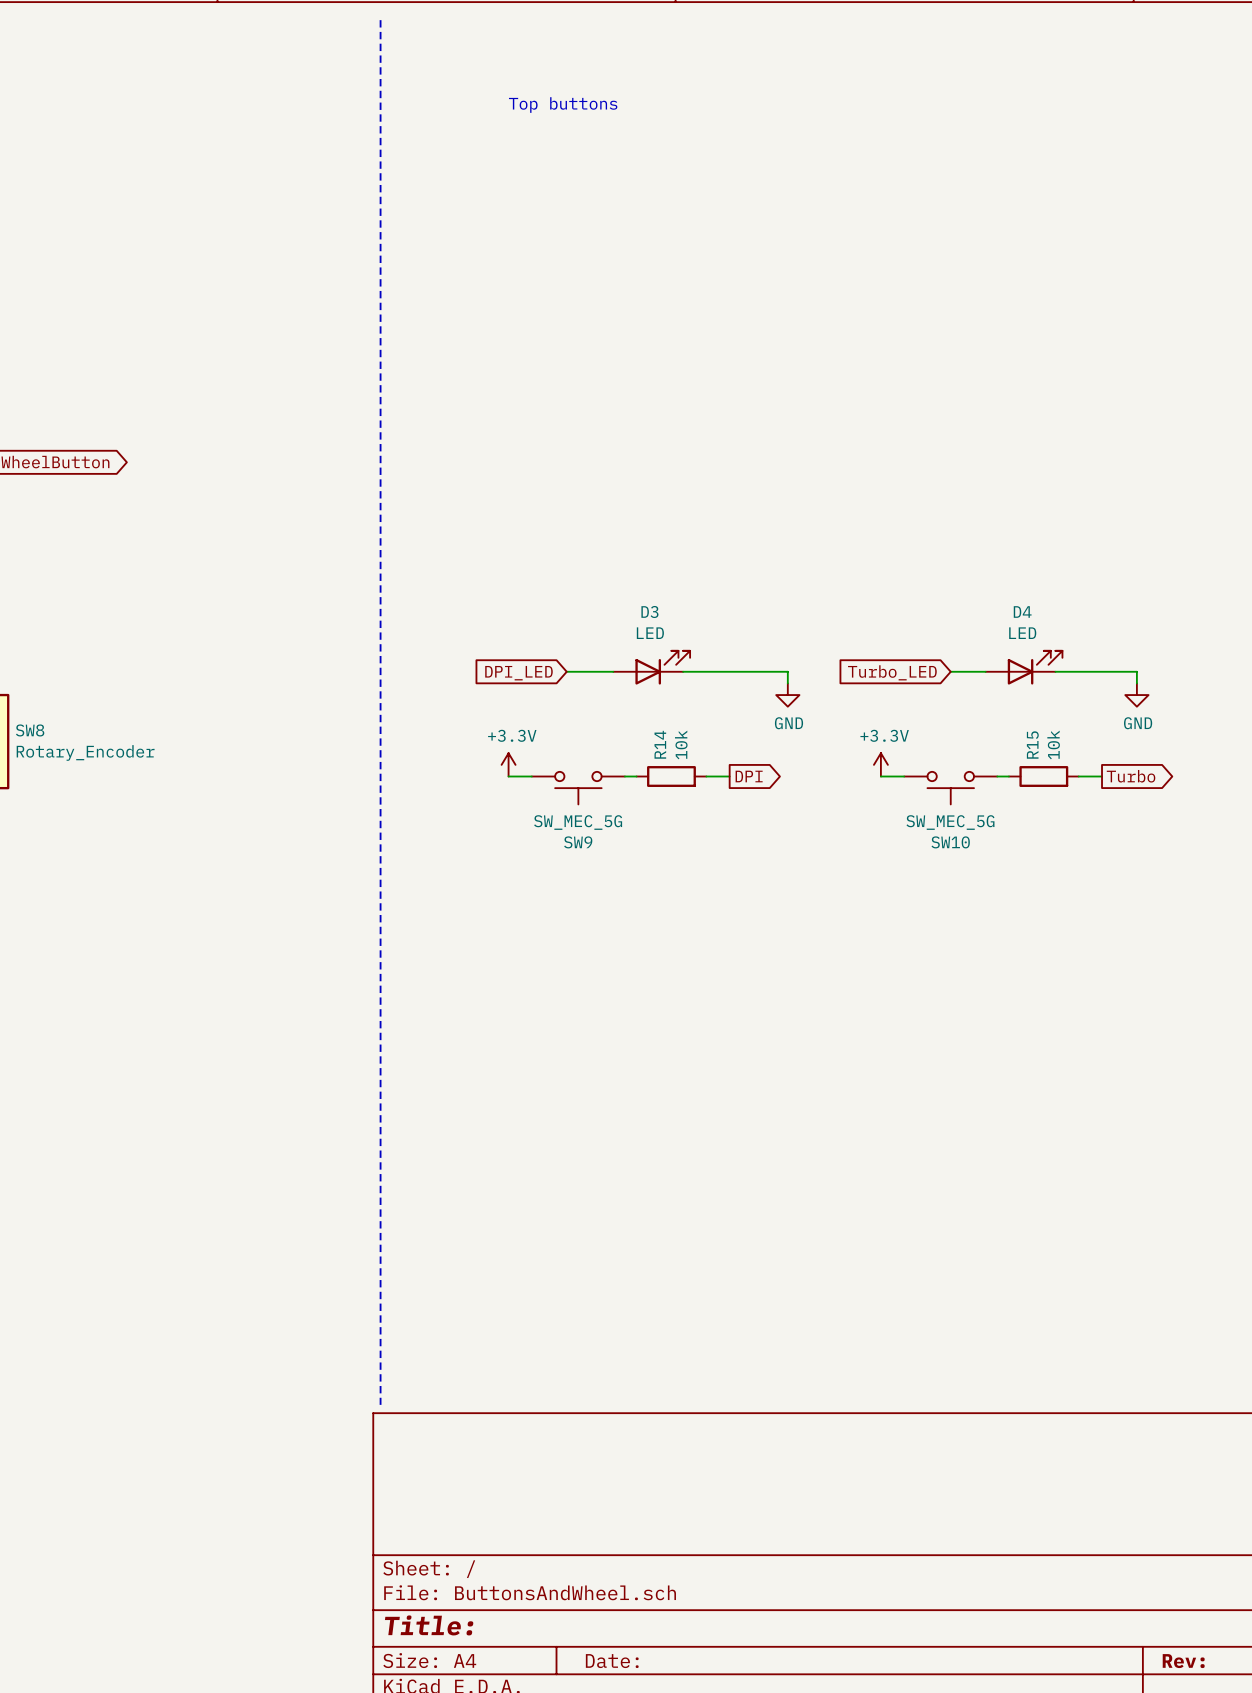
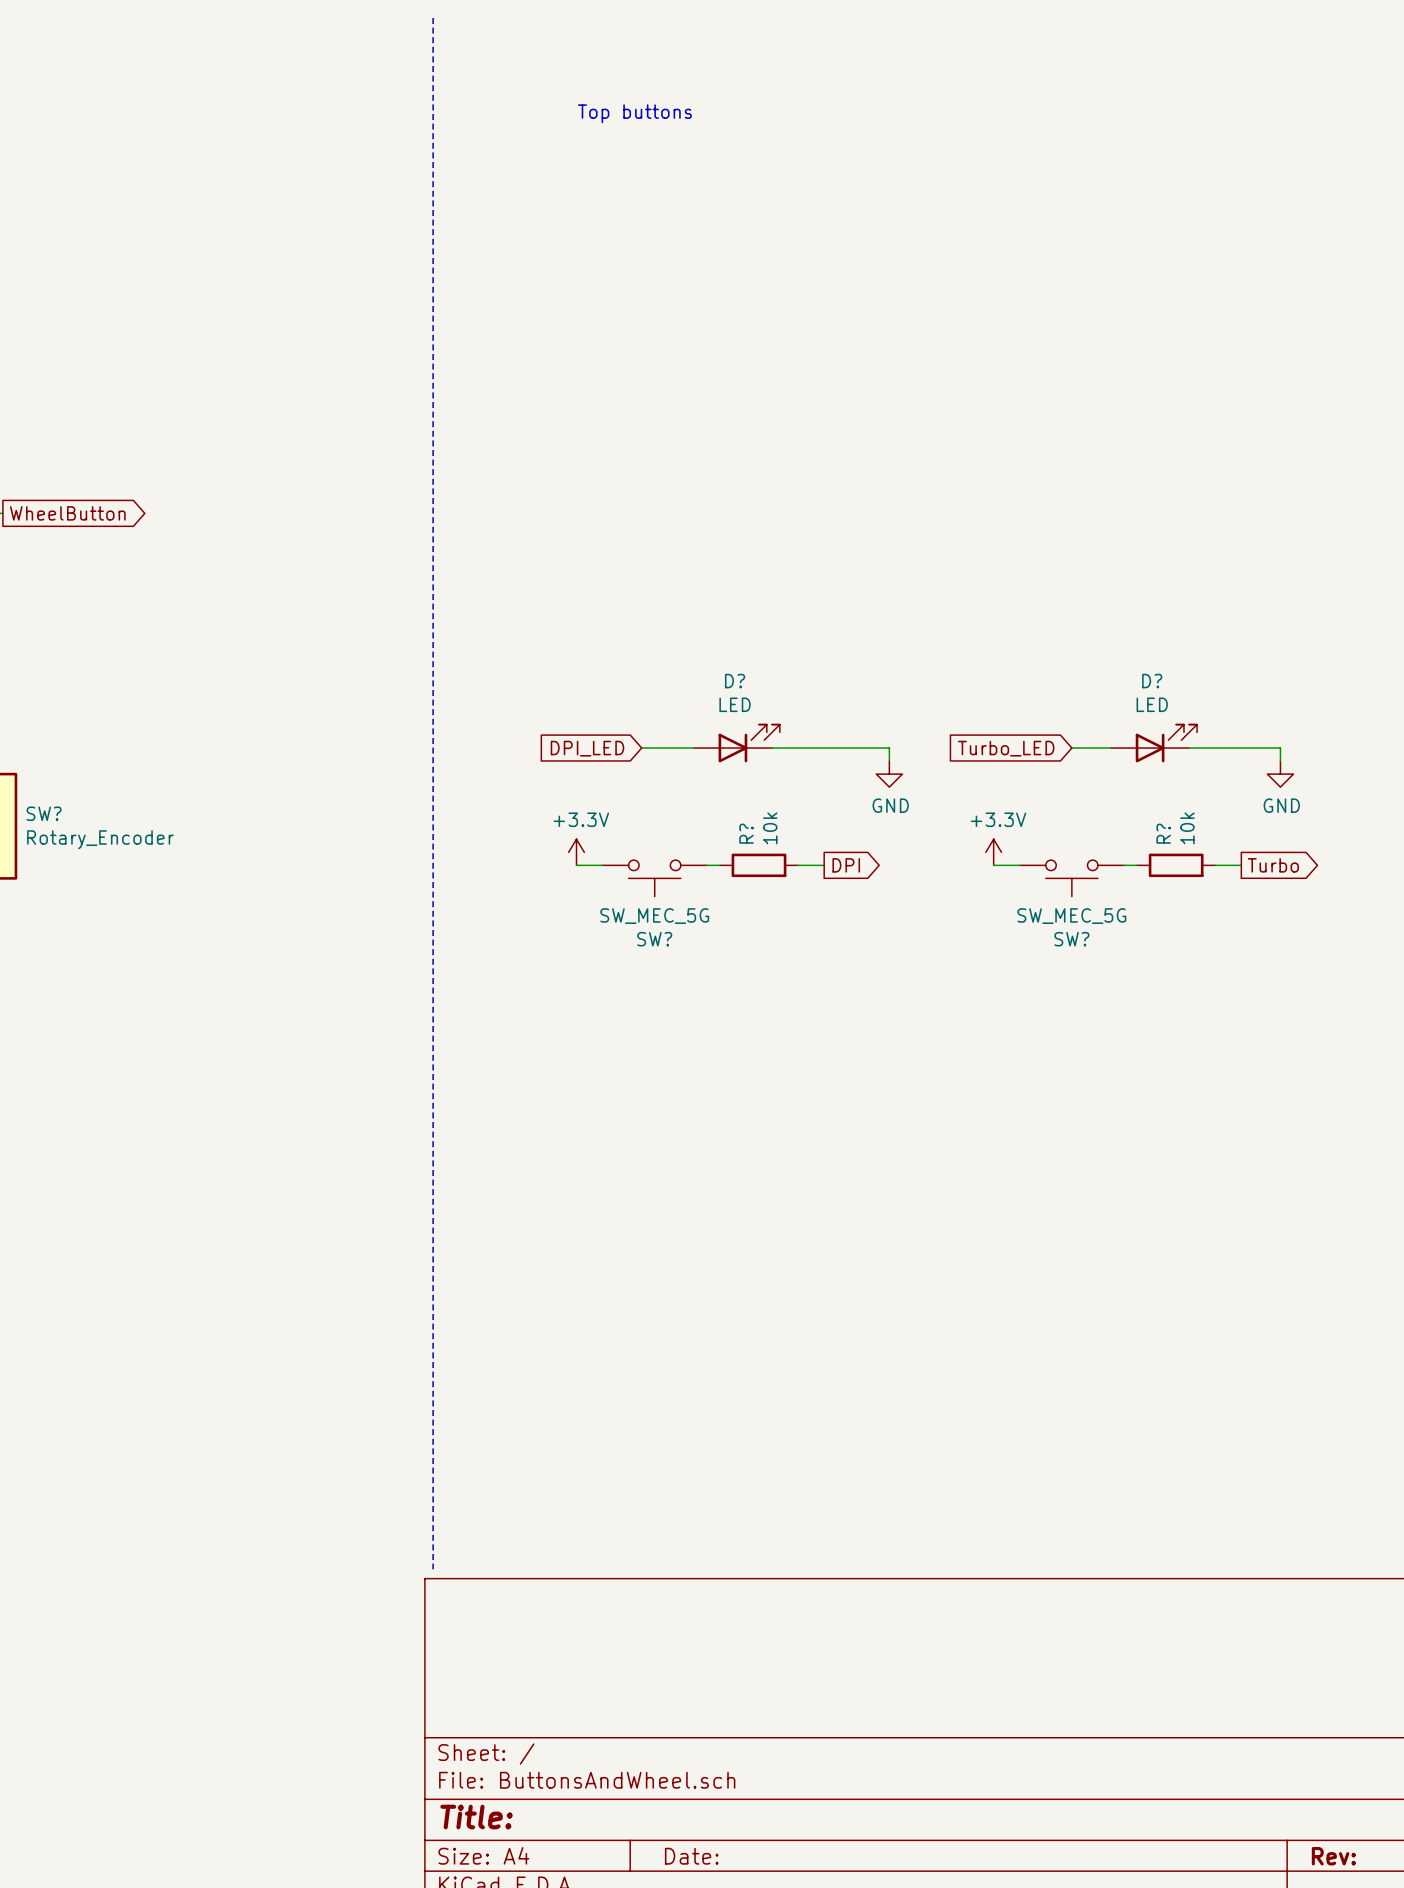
D3 name: D3 (649, 612) -> D? (735, 681)
D4 name: D4 (1022, 612) -> D? (1152, 681)
SW8 name: SW8 (30, 730) -> SW? (44, 813)
R14 name: R14 (660, 744) -> R? (746, 833)
R15 name: R15 (1032, 745) -> R? (1163, 833)
SW9 name: SW9 (578, 842) -> SW? (654, 939)
SW10 name: SW10 (950, 842) -> SW? (1071, 939)

